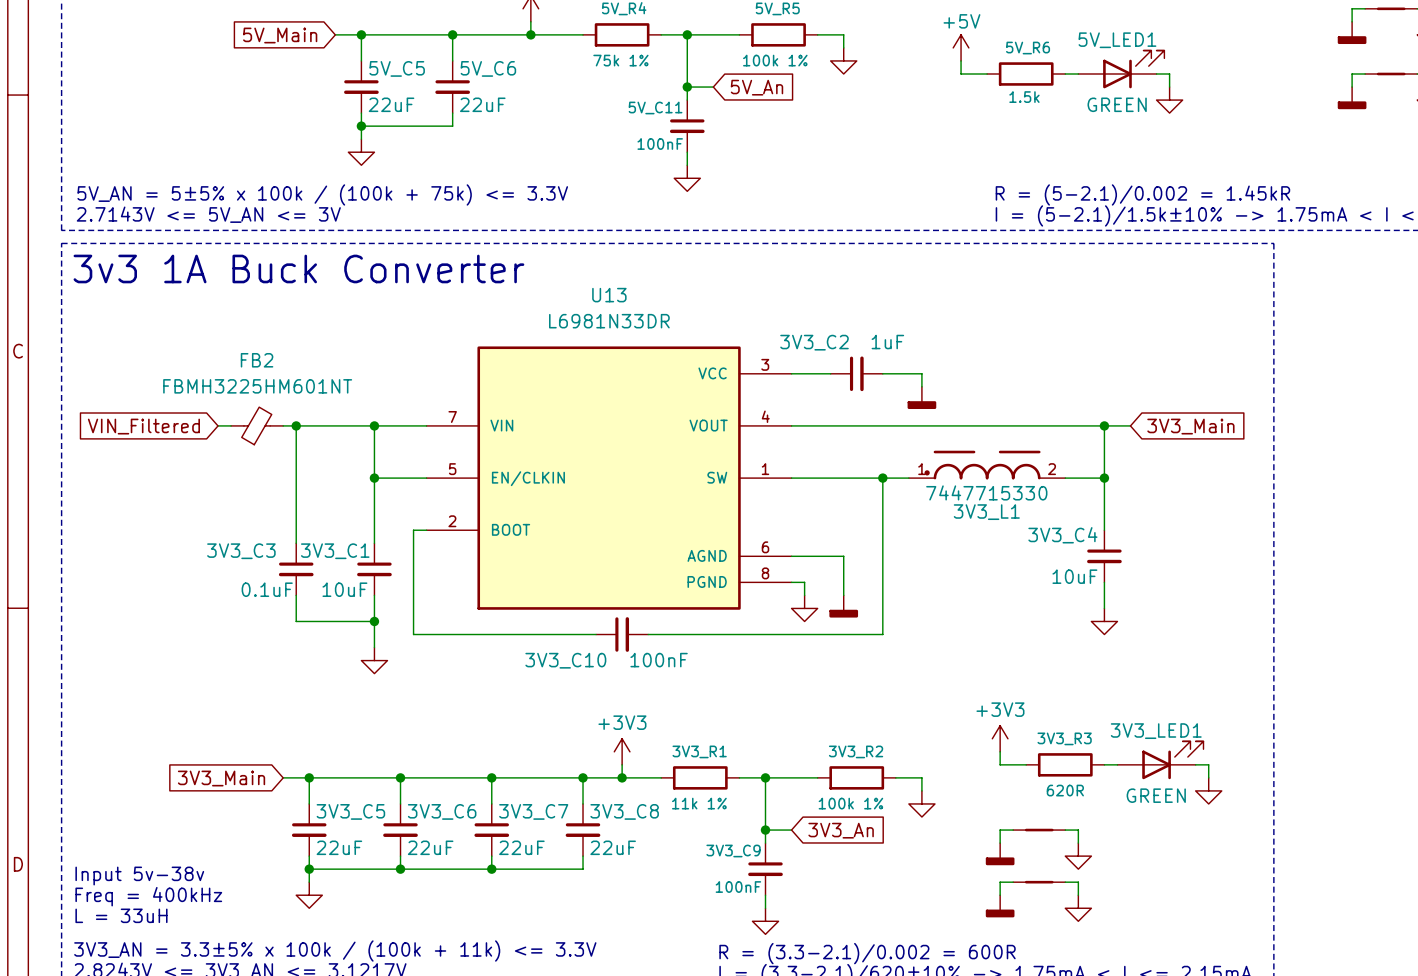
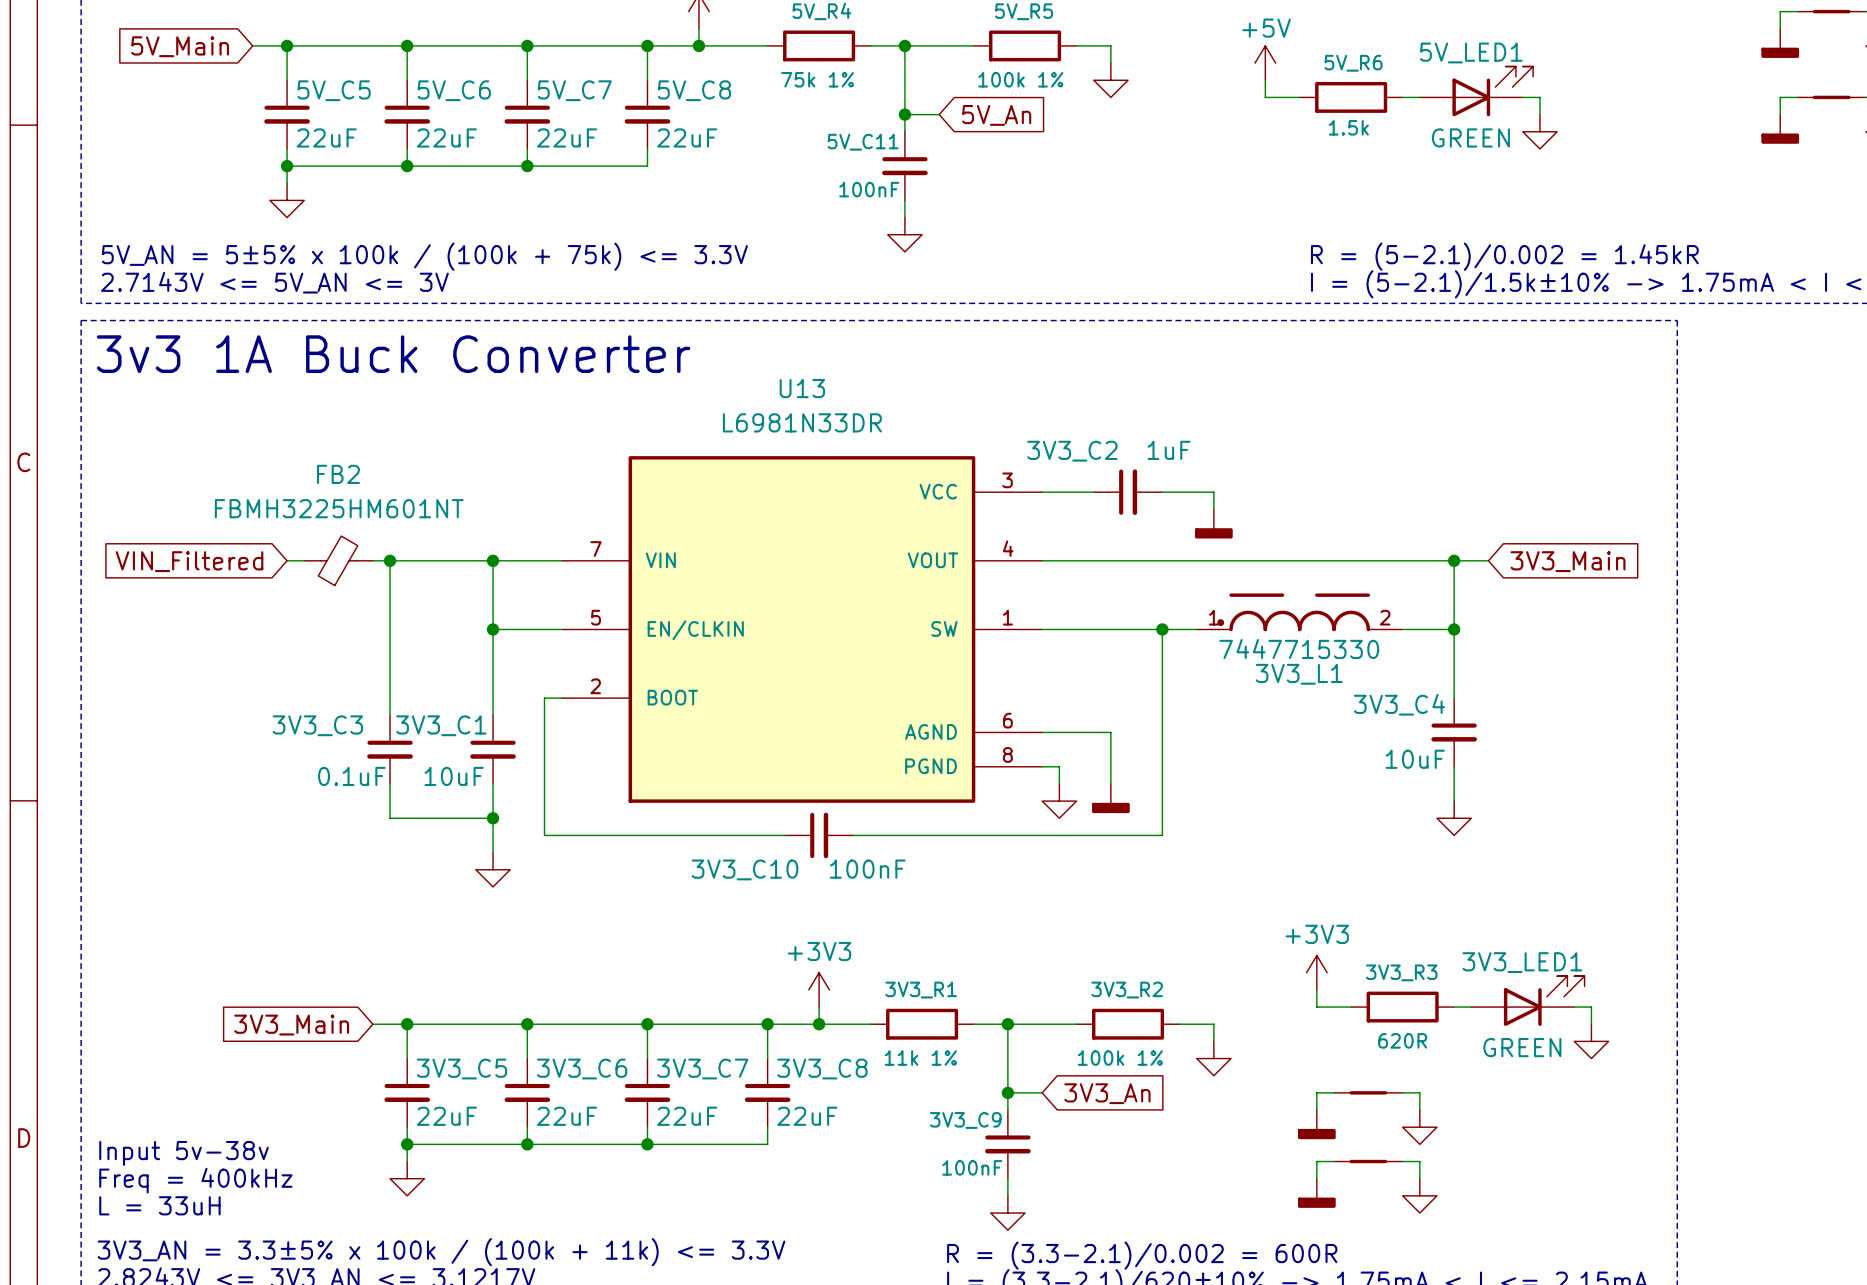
wire: none -> (252, 45) (441, 45)
junction: none -> (287, 45)
junction: none -> (407, 45)
wire: (361, 34) (361, 60) -> (287, 45) (287, 80)
junction: (361, 34) -> none
wire: none -> (527, 45) (527, 80)
junction: none -> (527, 45)
wire: (452, 34) (452, 60) -> (407, 45) (407, 80)
junction: (452, 34) -> none
wire: none -> (647, 45) (647, 80)
junction: none -> (647, 45)
global label position: 5V_Main (280, 35) -> 5V_Main (180, 46)
5V_C5 position: (361, 87) -> (287, 114)
5V_C7: none -> 22uF (527, 114)
5V_C6 position: (452, 87) -> (407, 114)
5V_C8: none -> 22uF (647, 114)
wire: none -> (407, 148) (407, 166)
wire: (361, 113) (361, 139) -> (287, 148) (287, 183)
wire: none -> (527, 148) (527, 166)
wire: (452, 113) (452, 126) -> (647, 148) (647, 166) (595, 166)
wire: none -> (287, 166) (475, 166)
junction: none -> (287, 166)
junction: none -> (407, 166)
junction: (361, 126) -> none
junction: none -> (527, 166)
power symbol position: (361, 152) -> (287, 200)

